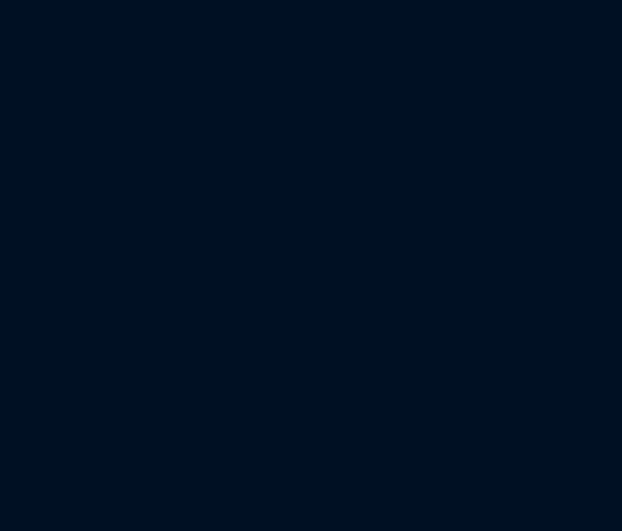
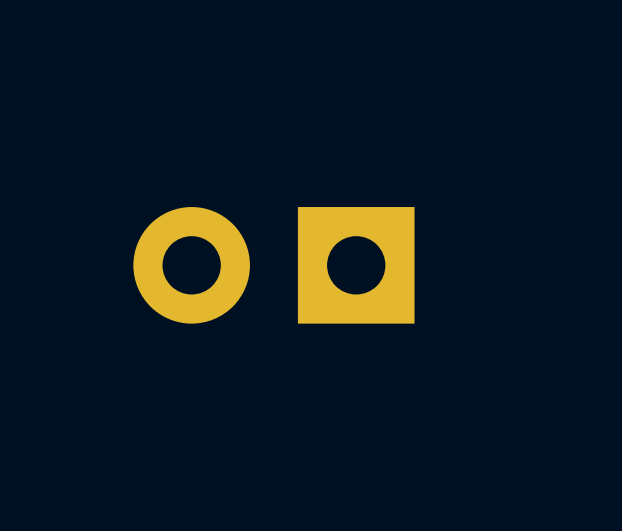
part: none -> (273, 265)

